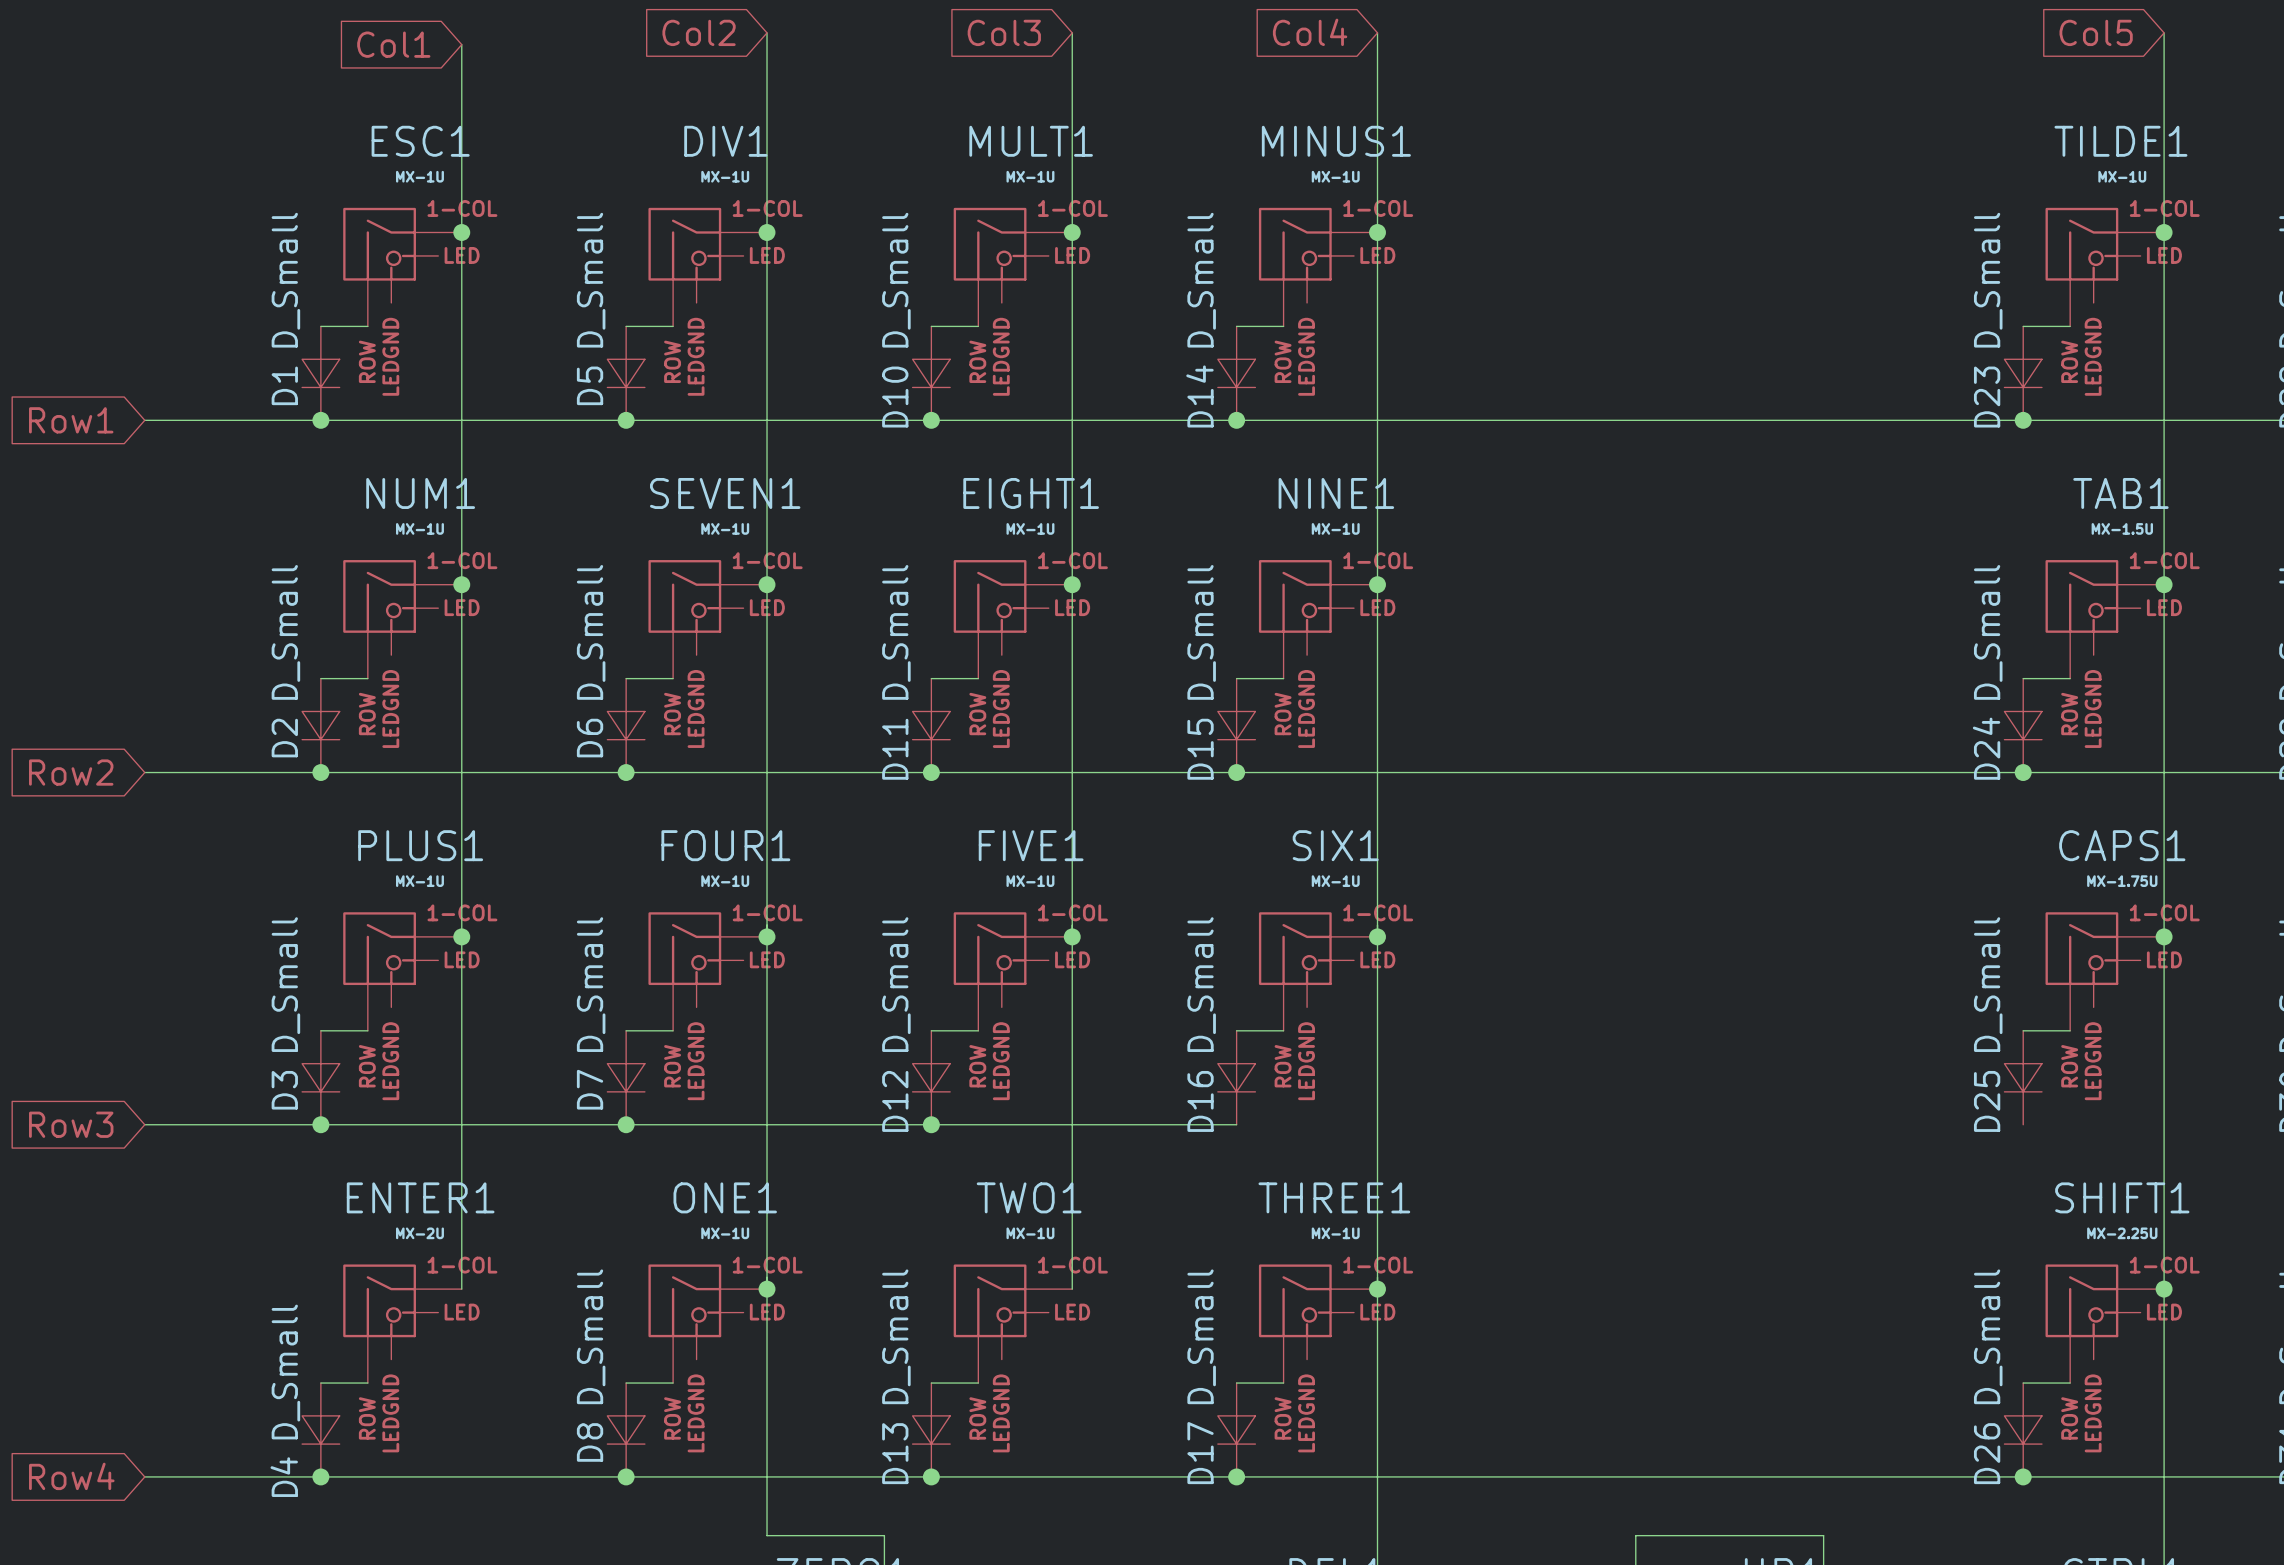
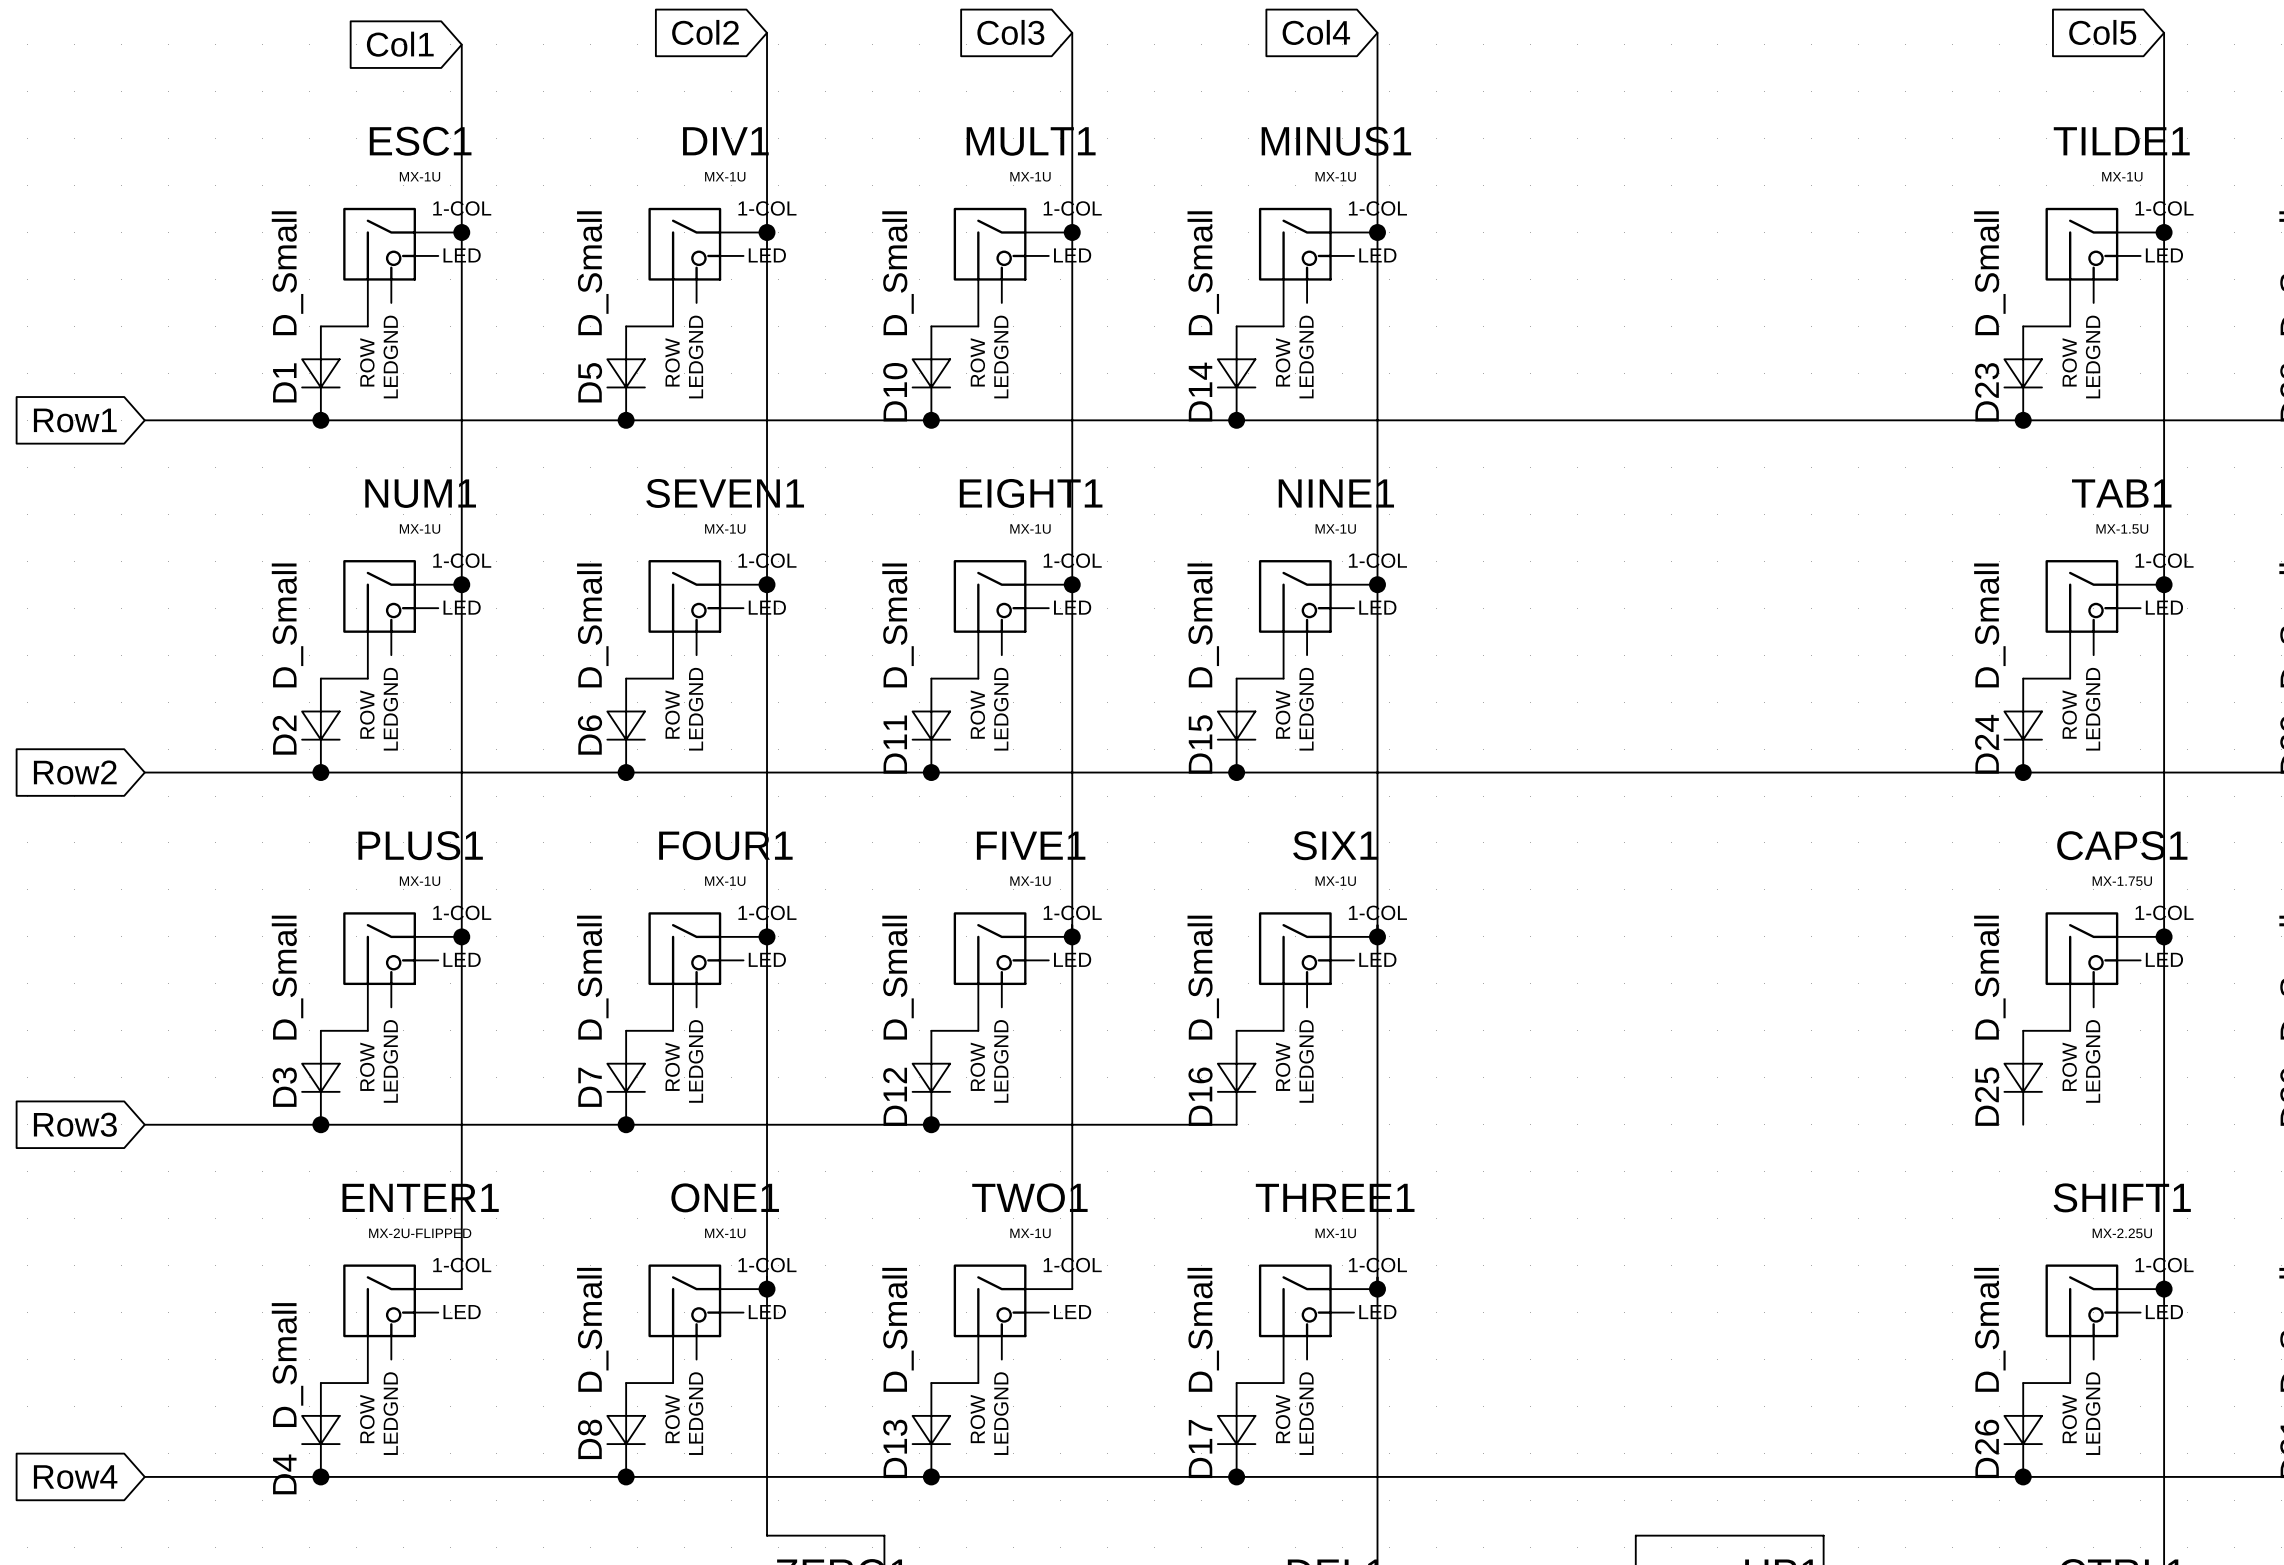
ENTER1 value: MX-2U (419, 1233) -> MX-2U-FLIPPED (420, 1233)

